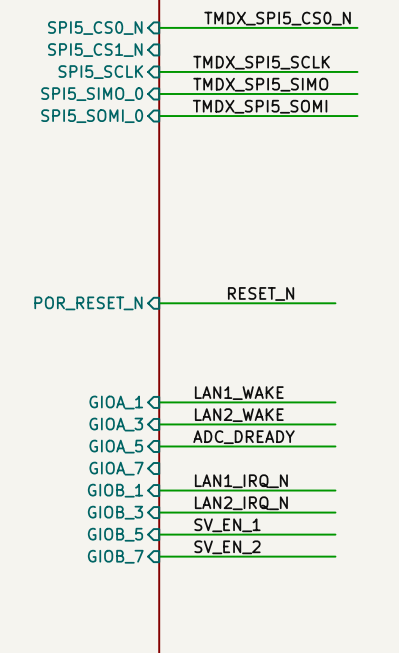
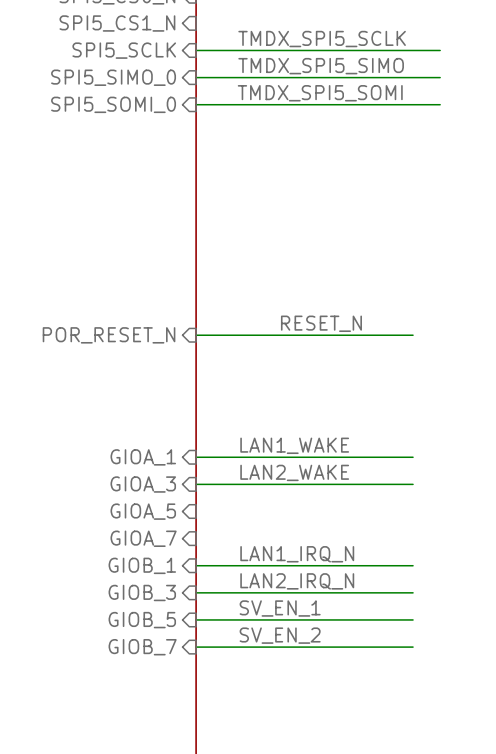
label: ADC_DREADY (244, 437) -> none
wire: (159, 446) (335, 446) -> none

